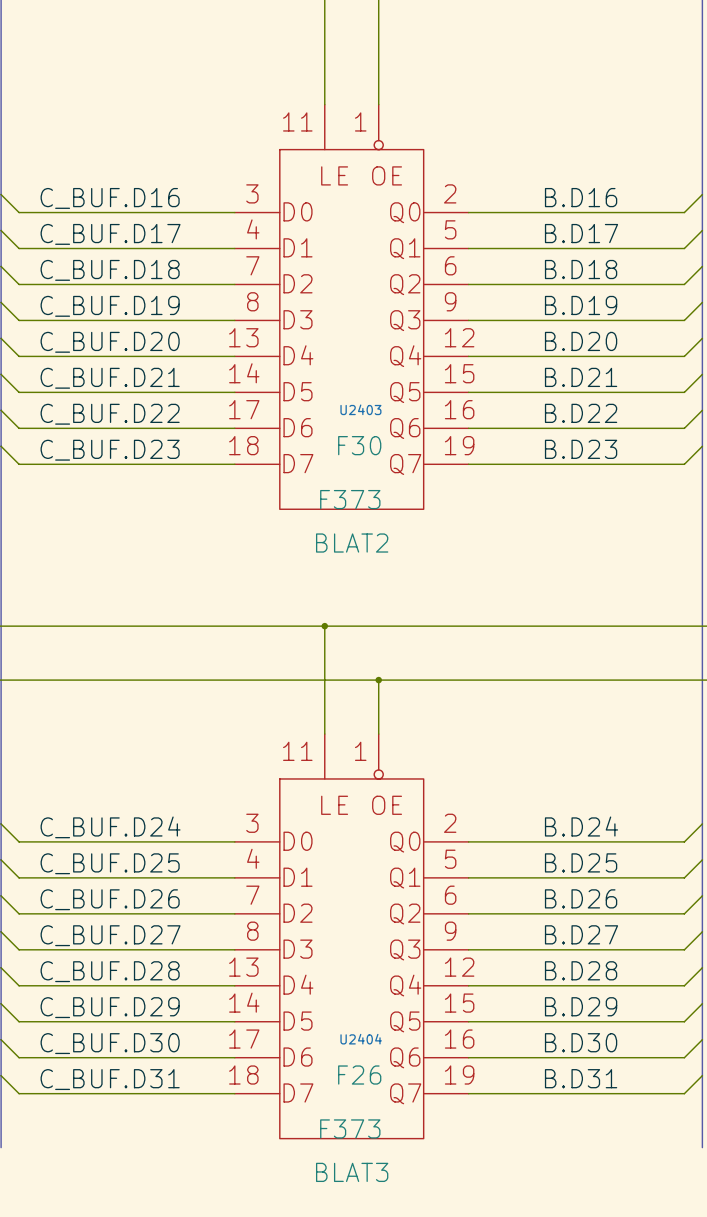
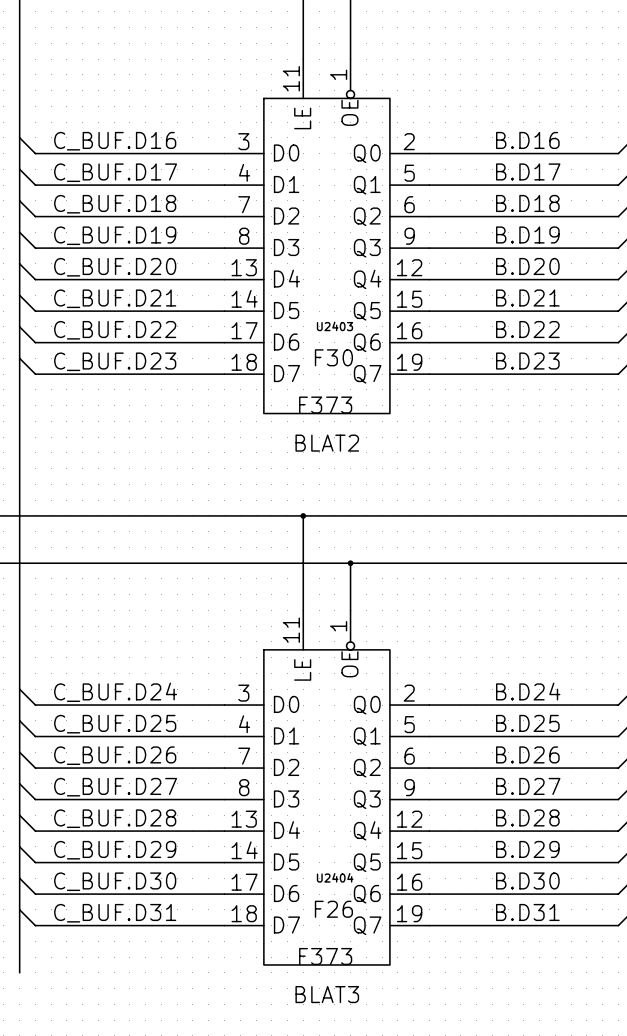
U2403 symbol: [234, 104, 469, 510] -> [224, 59, 430, 414]
U2404 symbol: [234, 734, 469, 1139] -> [224, 610, 430, 965]

